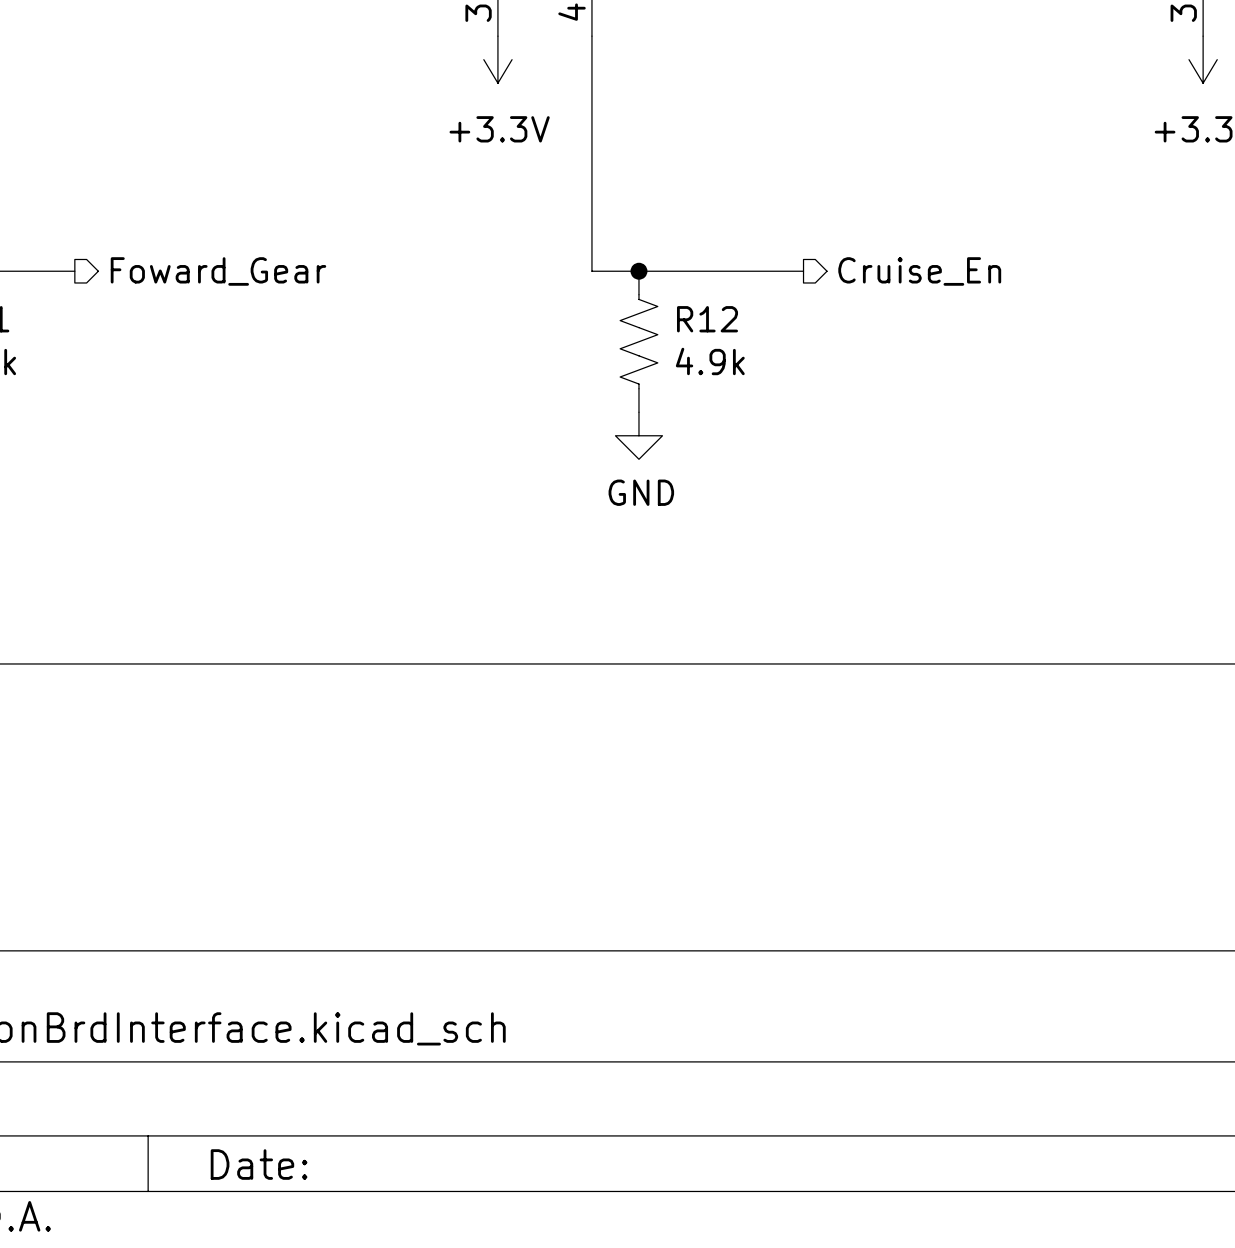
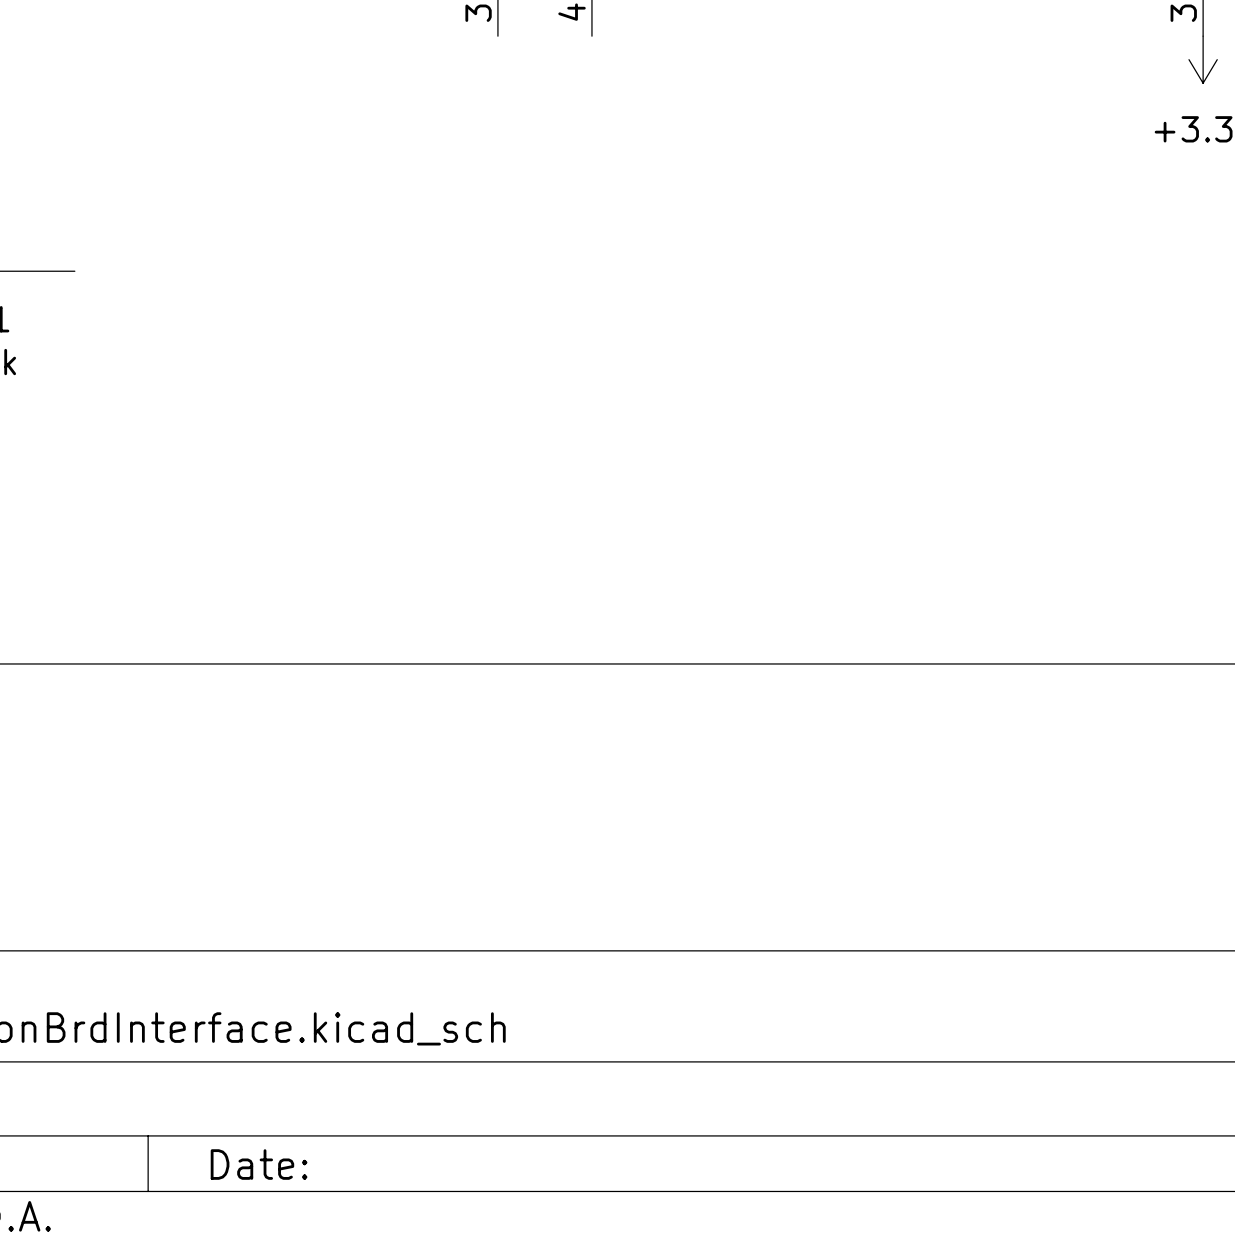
wire: (591, 36) (591, 271) (803, 271) -> none
power symbol: +3.3V (497, 59) -> none
hierarchical label: Foward_Gear (218, 271) -> none
junction: (638, 271) -> none
hierarchical label: Cruise_En (919, 271) -> none
R12: 4.9k (638, 341) -> none
power symbol: GND (638, 435) -> none

